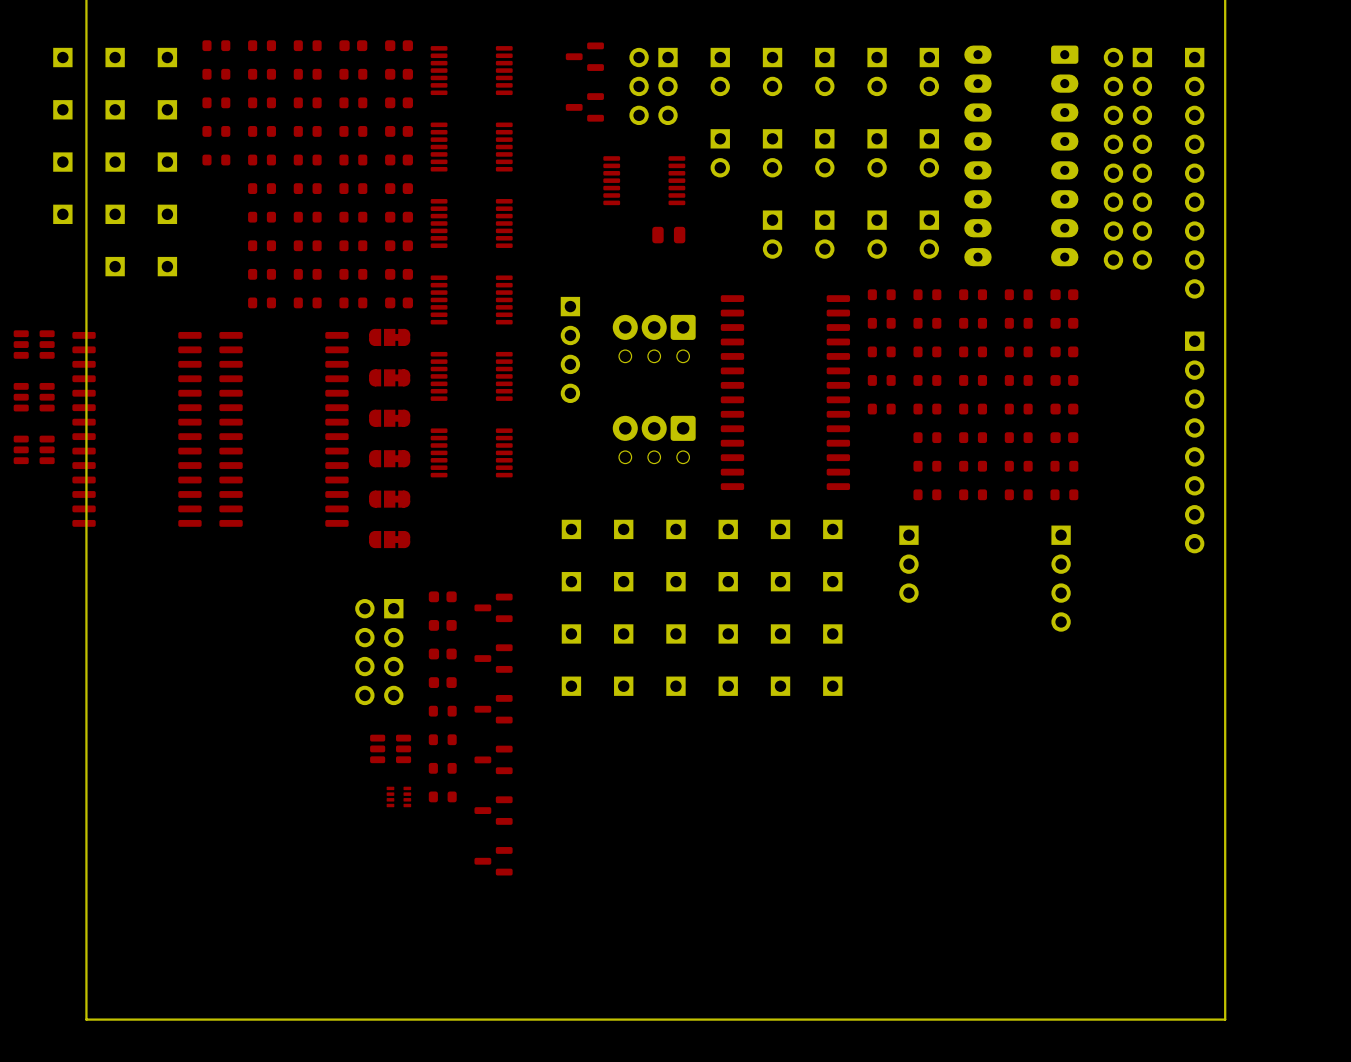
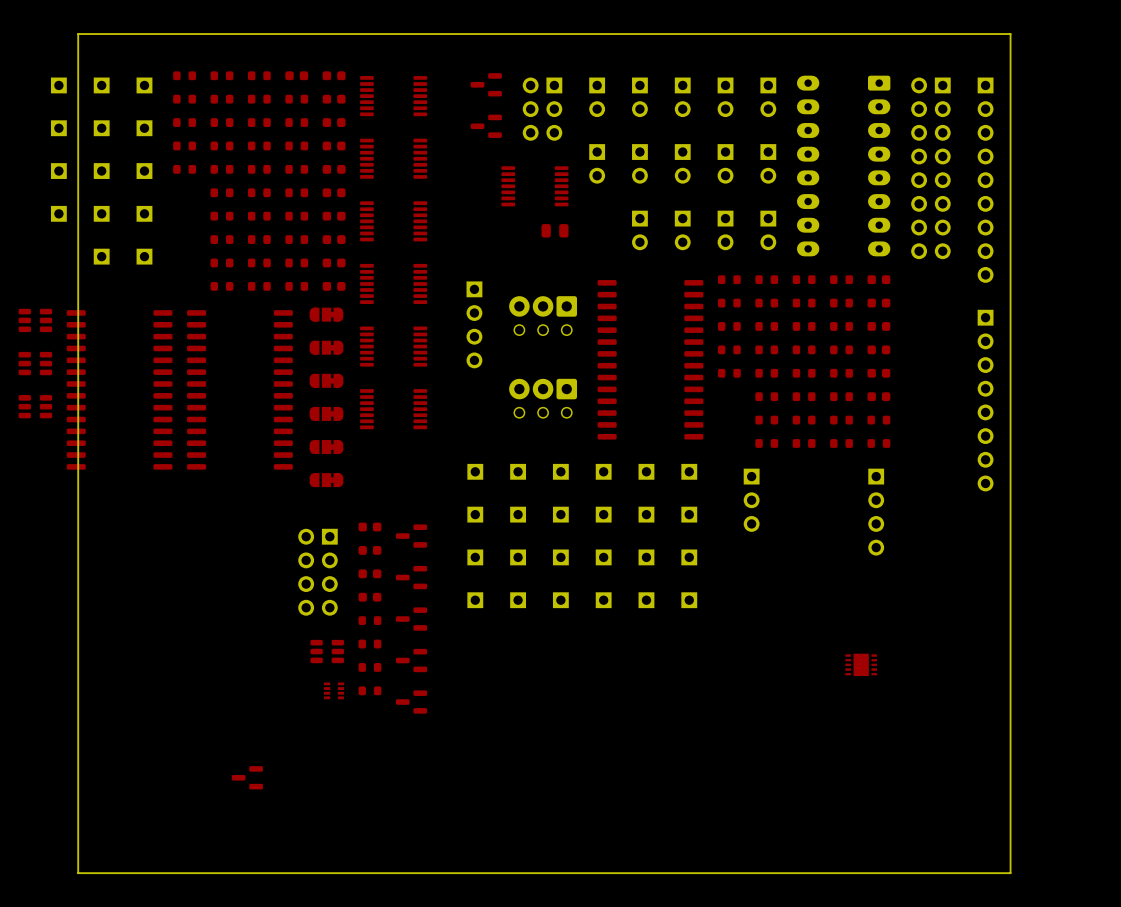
part: none -> (861, 664)
part position: (493, 861) -> (247, 777)

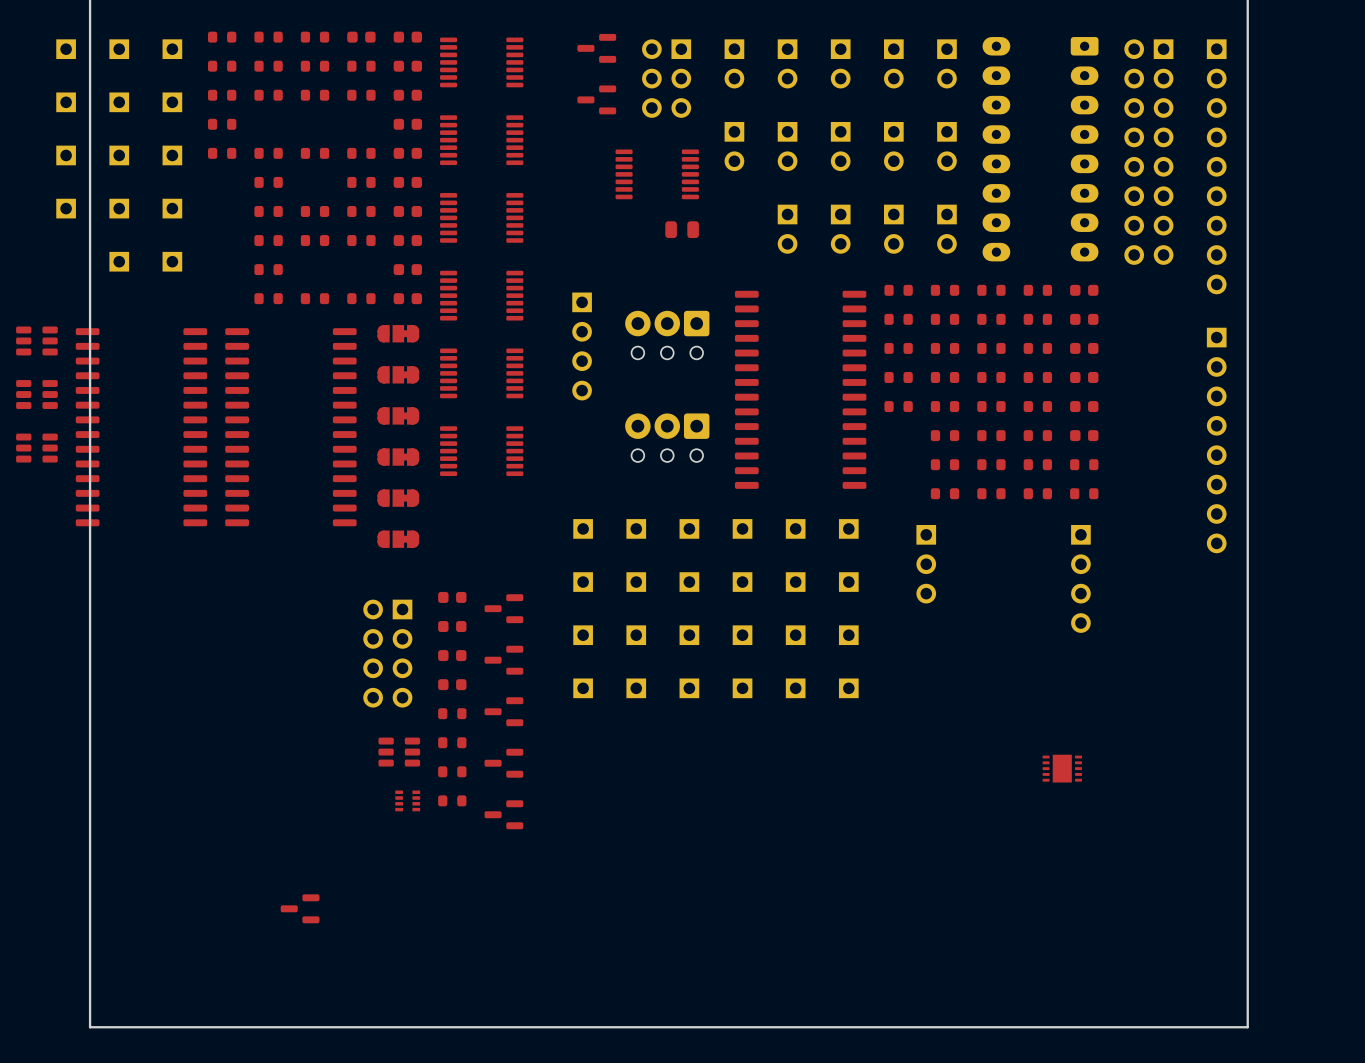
part: (221, 145) -> none
part: (259, 145) -> none
part: (296, 145) -> none
part: (259, 192) -> none
part: (259, 262) -> none
part: (296, 262) -> none

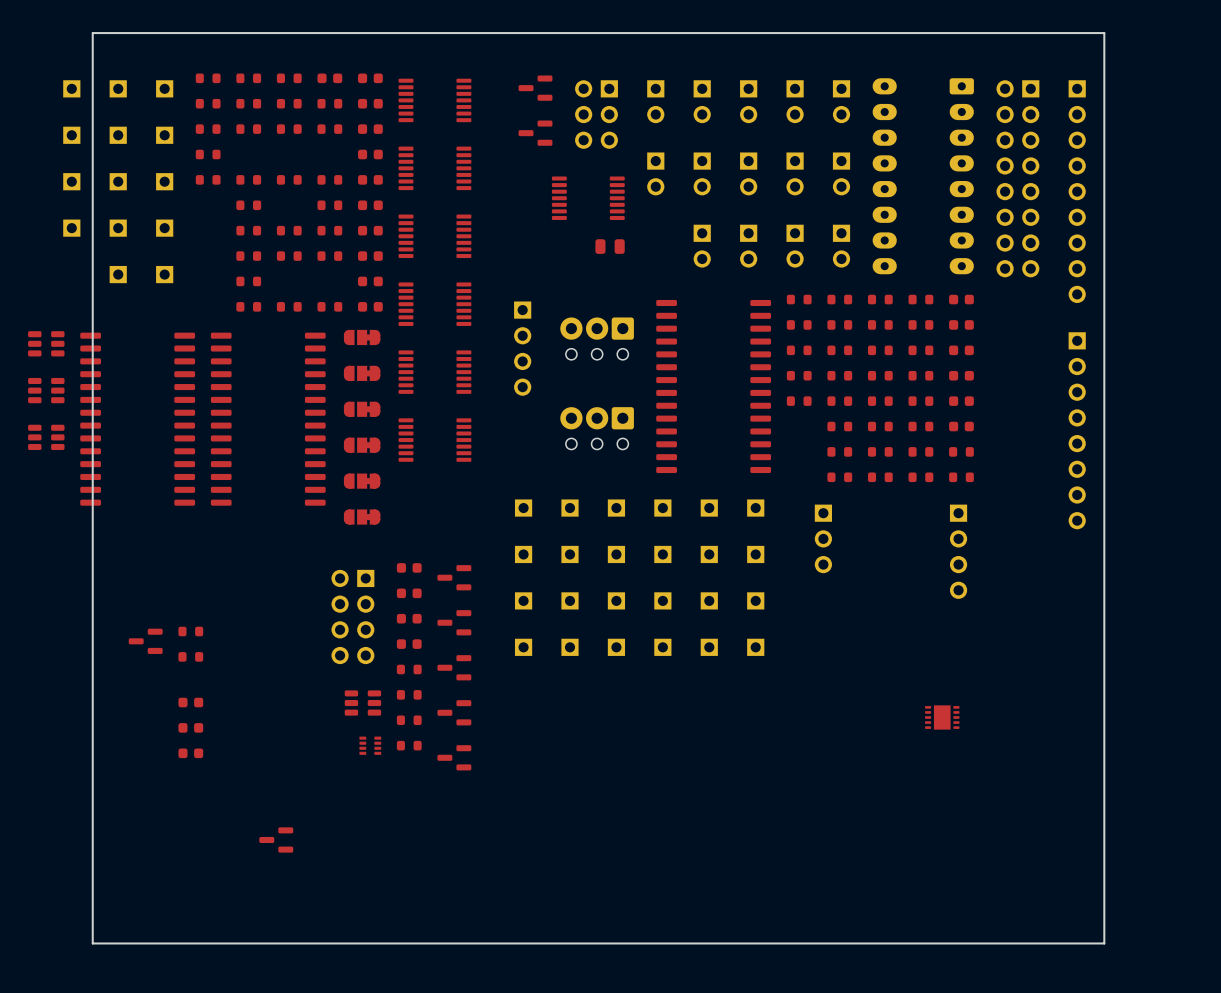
part: none -> (190, 631)
part: none -> (145, 641)
part: none -> (190, 656)
part: none -> (190, 702)
part: none -> (190, 727)
part: none -> (190, 753)

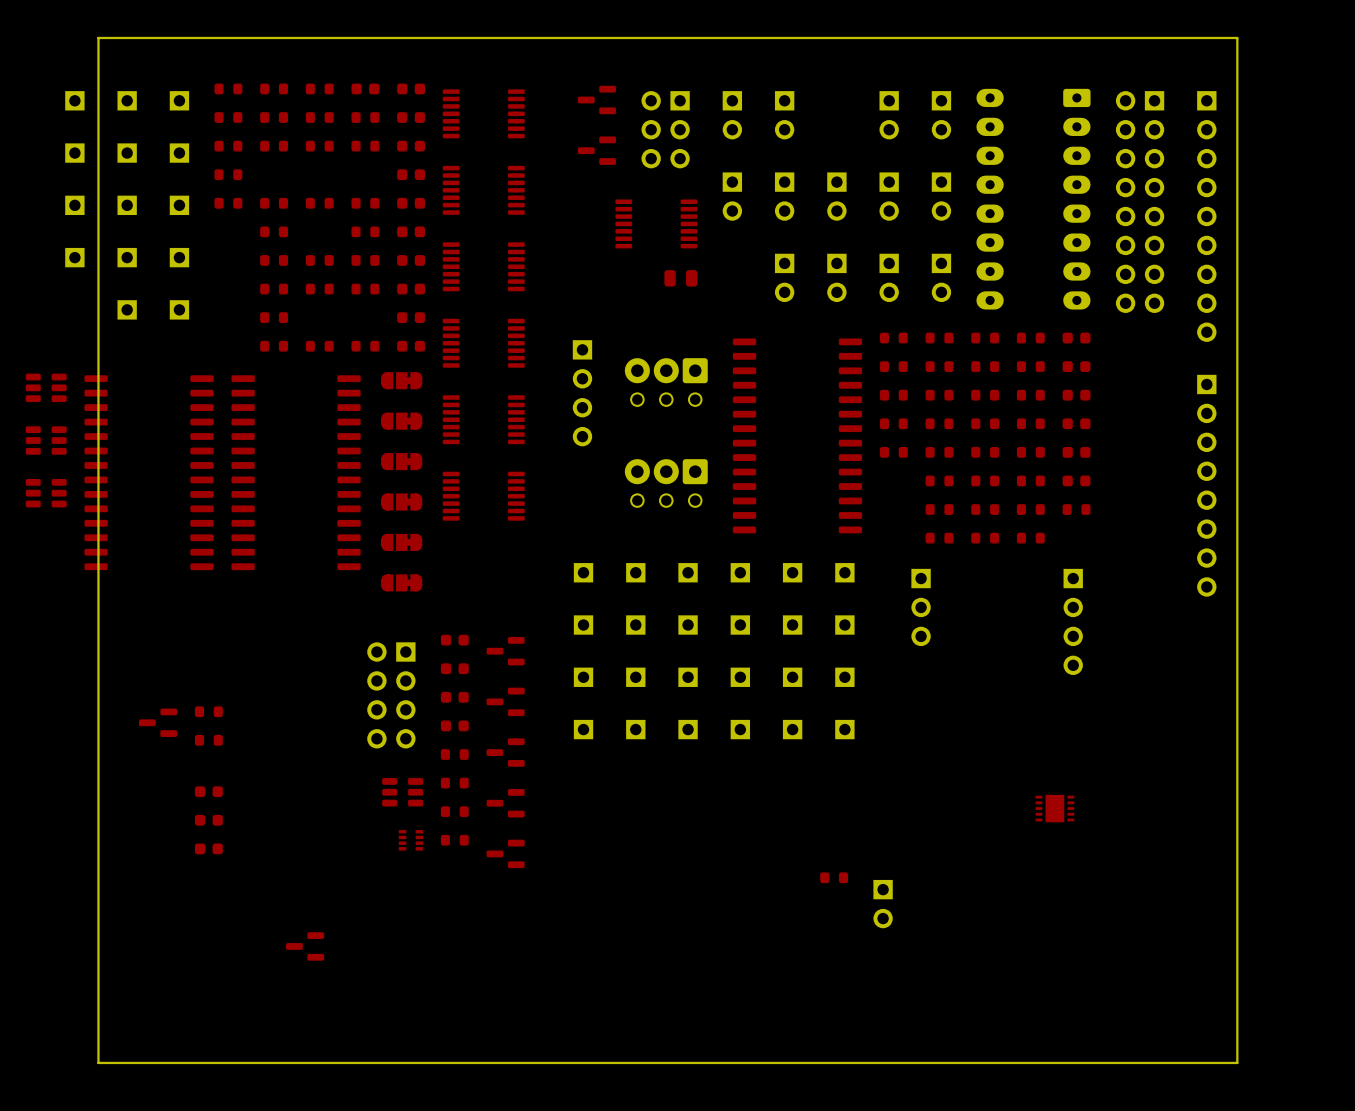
part: (748, 101) -> none
part: (961, 477) -> none
part: none -> (834, 877)
part: none -> (883, 904)

